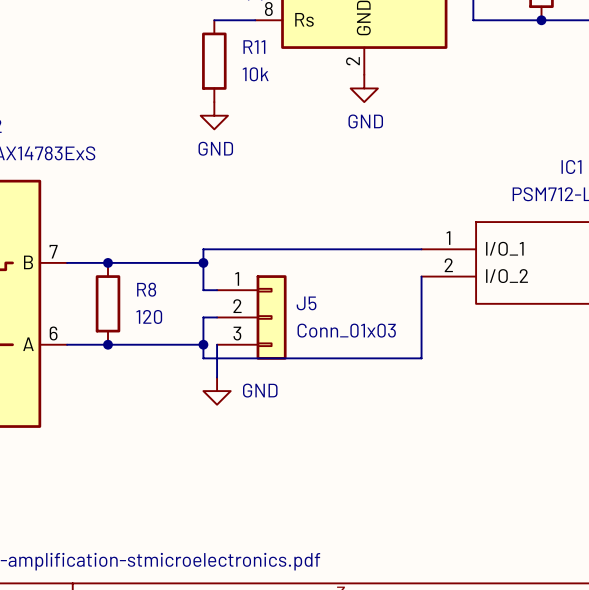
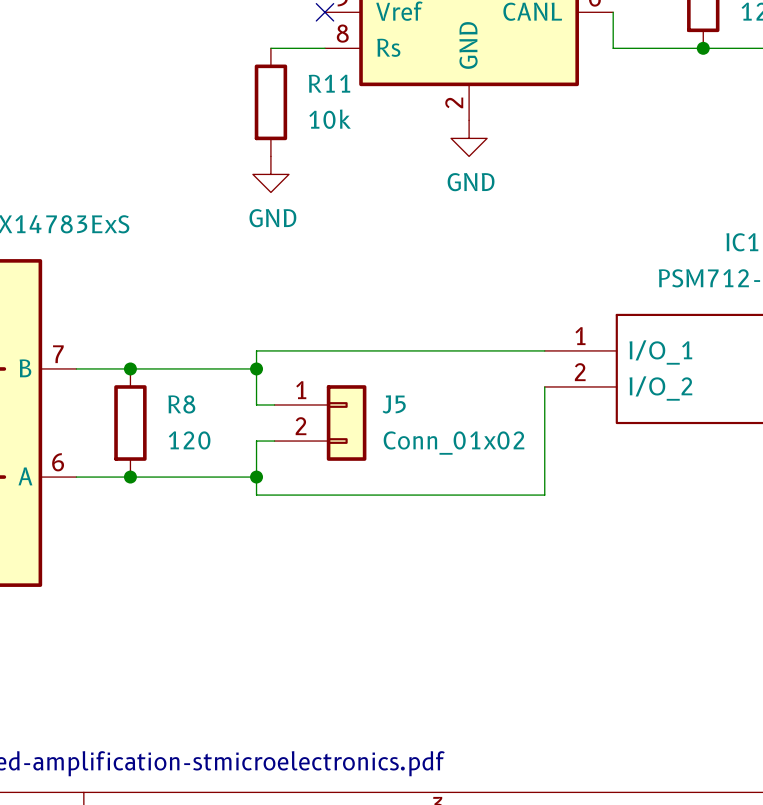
J5 symbol: [217, 275, 287, 360] -> [274, 385, 367, 461]
J5 value: Conn_01x03 (346, 330) -> Conn_01x02 (454, 443)
wire: (217, 344) (217, 377) -> none
power symbol: GND (217, 391) -> none

